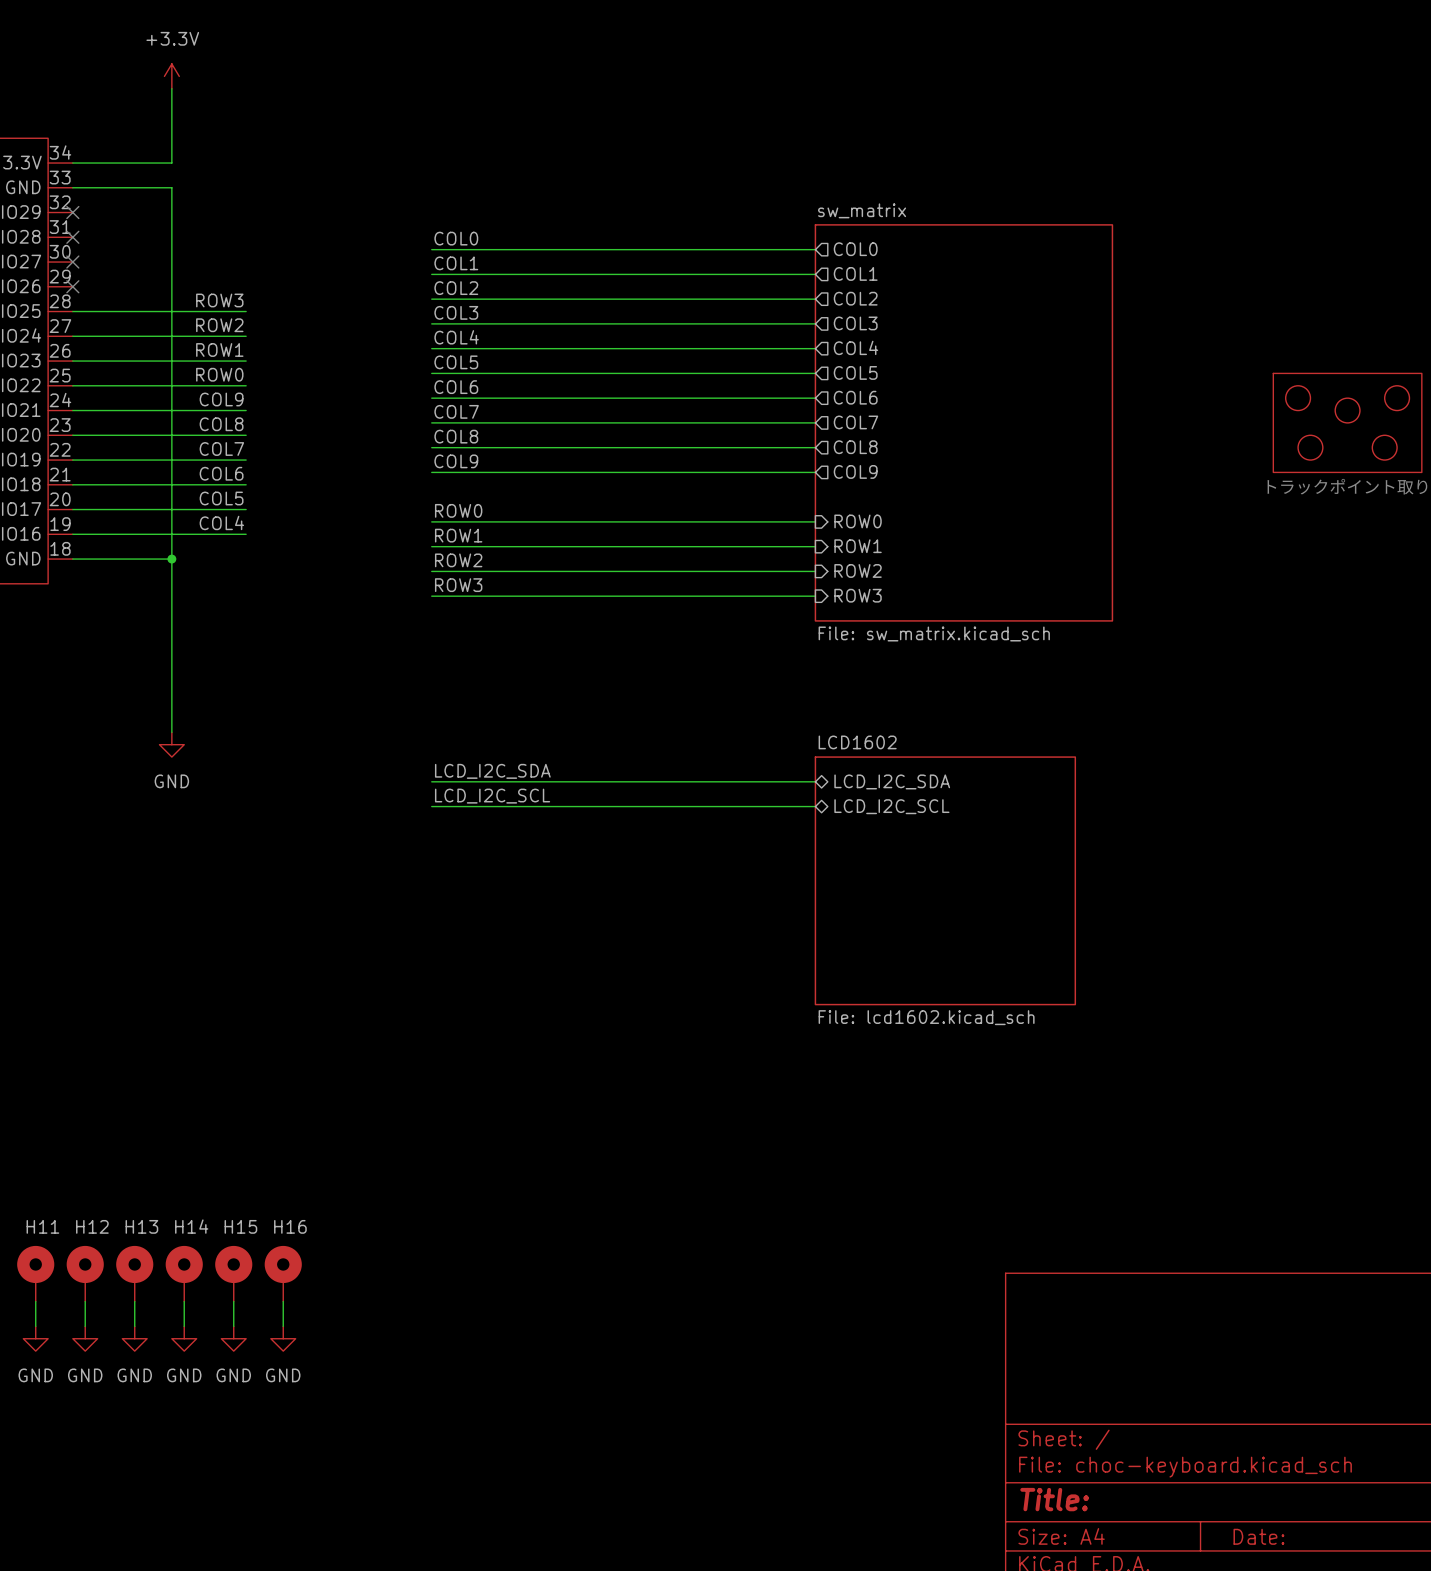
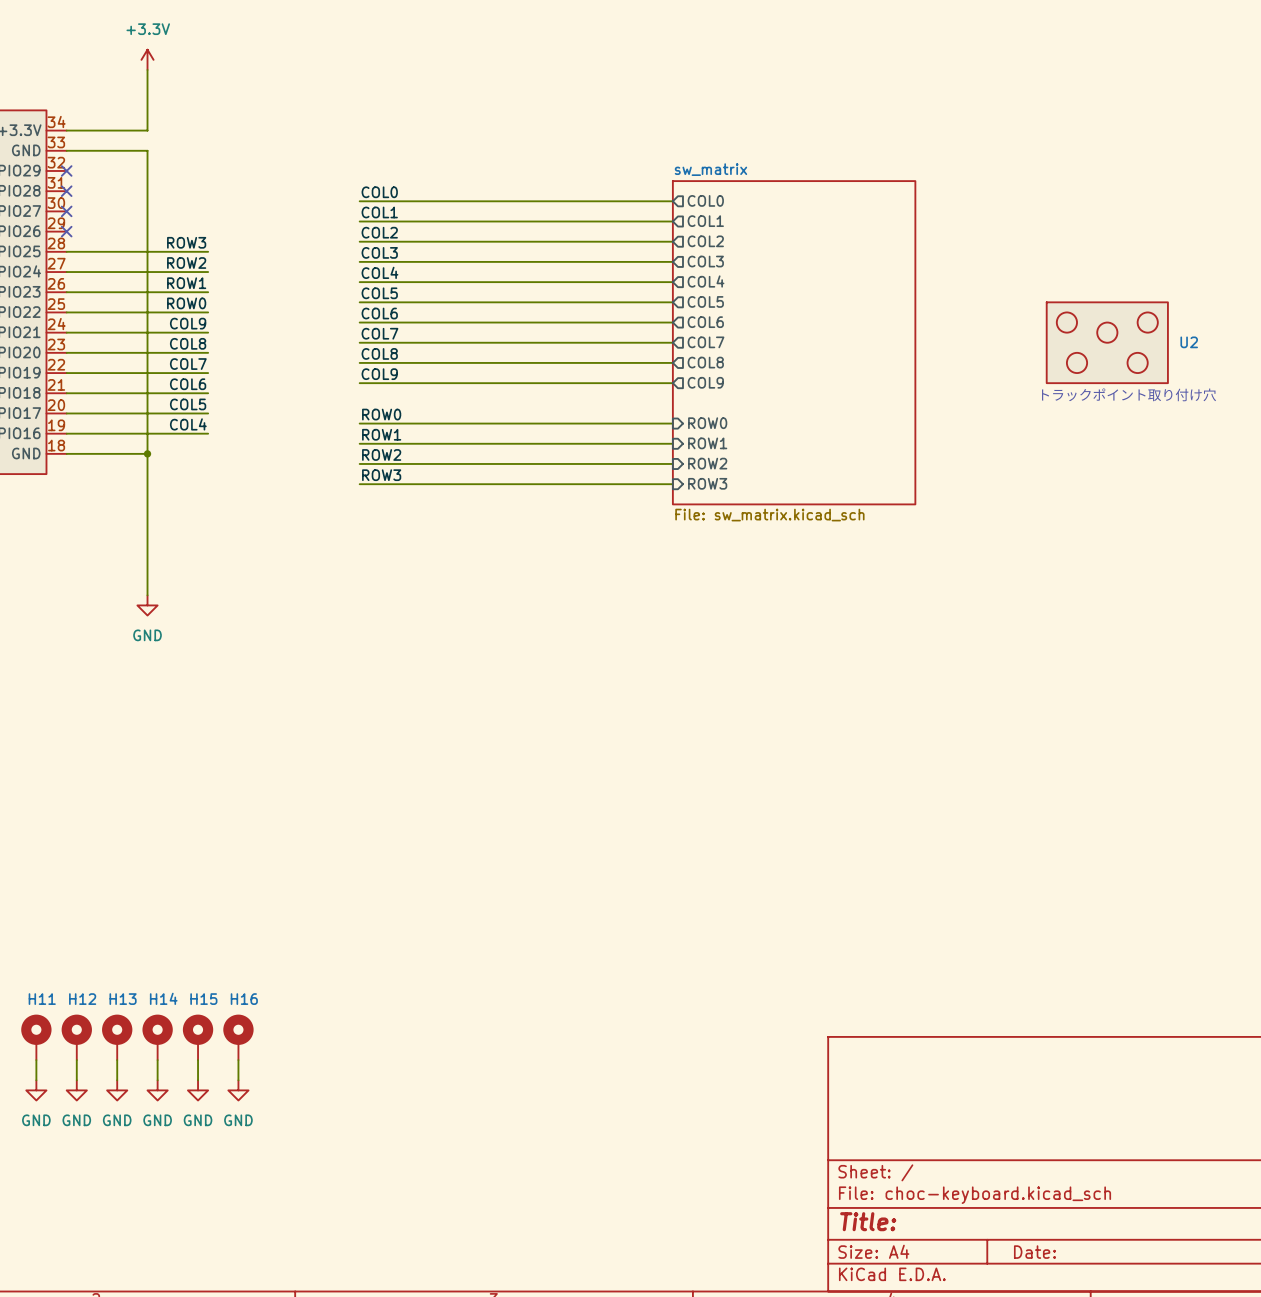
label: LCD_I2C_SDA (492, 771) -> none
wire: (431, 781) (815, 781) -> none
sheet pin: LCD_I2C_SDA (892, 781) -> none
label: LCD_I2C_SCL (492, 796) -> none
wire: (431, 806) (815, 806) -> none
sheet pin: LCD_I2C_SCL (891, 806) -> none
sheet LCD1602: File: lcd1602.kicad_sch (945, 880) -> none

